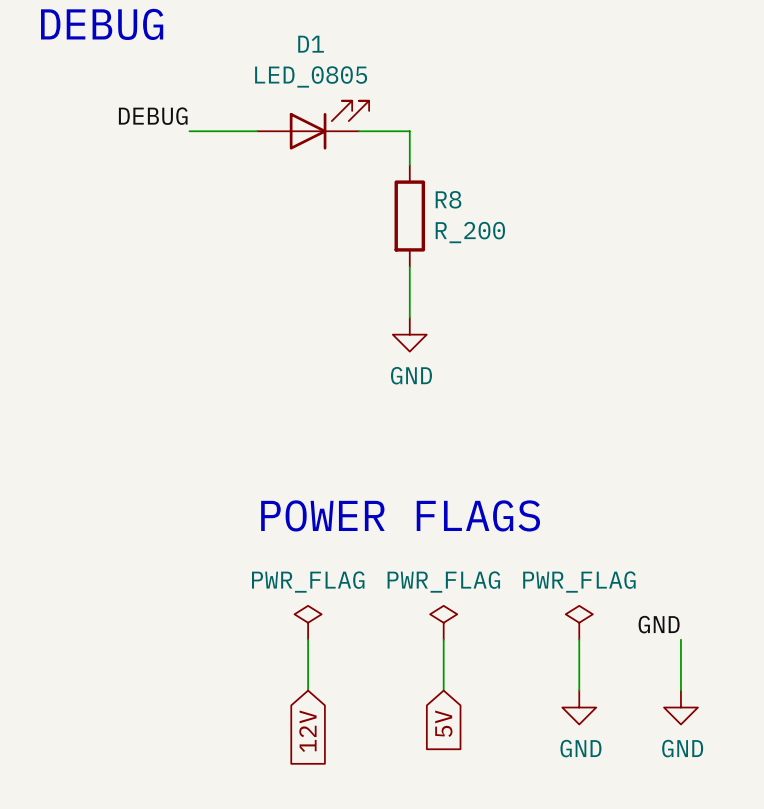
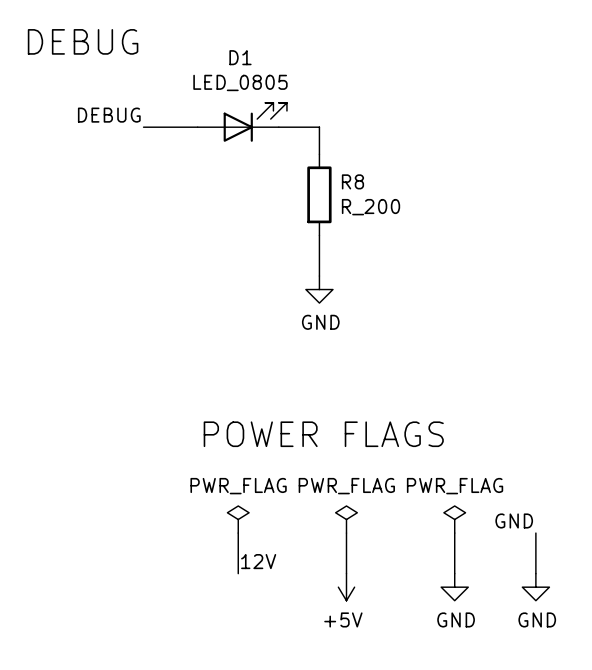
label: none -> 12V (258, 561)
power symbol: none -> +5V (346, 587)
global label: 5V (443, 723) -> none
global label: 12V (307, 731) -> none

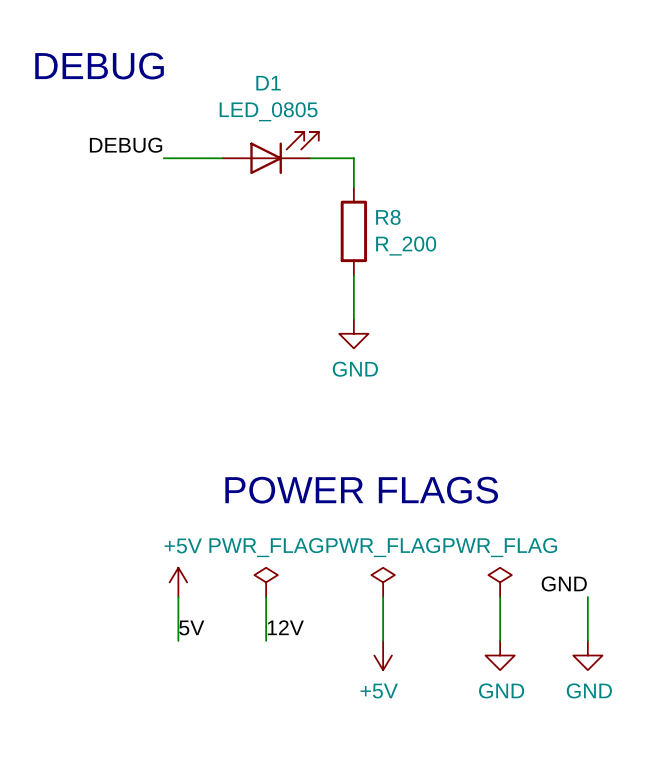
power symbol: none -> +5V (178, 582)
wire: none -> (178, 597) (178, 640)
label: none -> 5V (191, 627)

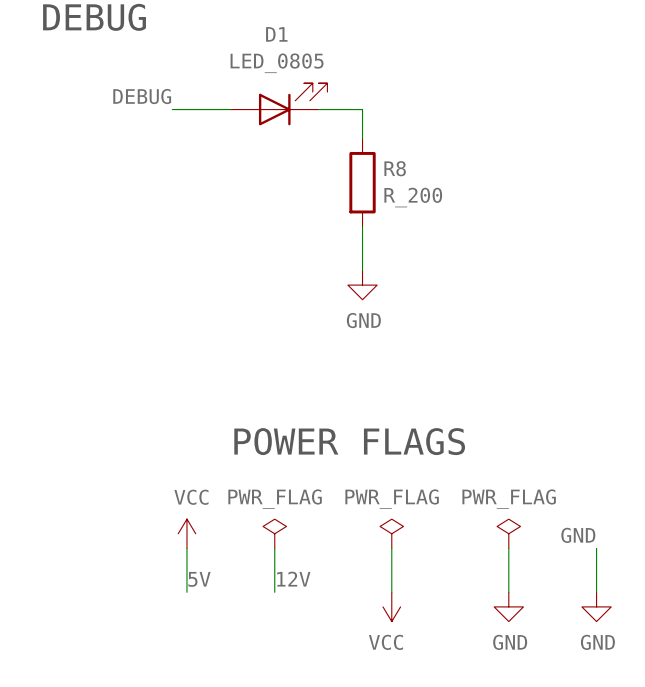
power symbol: +5V (178, 582) -> VCC (186, 533)
power symbol: +5V (383, 655) -> VCC (391, 606)

